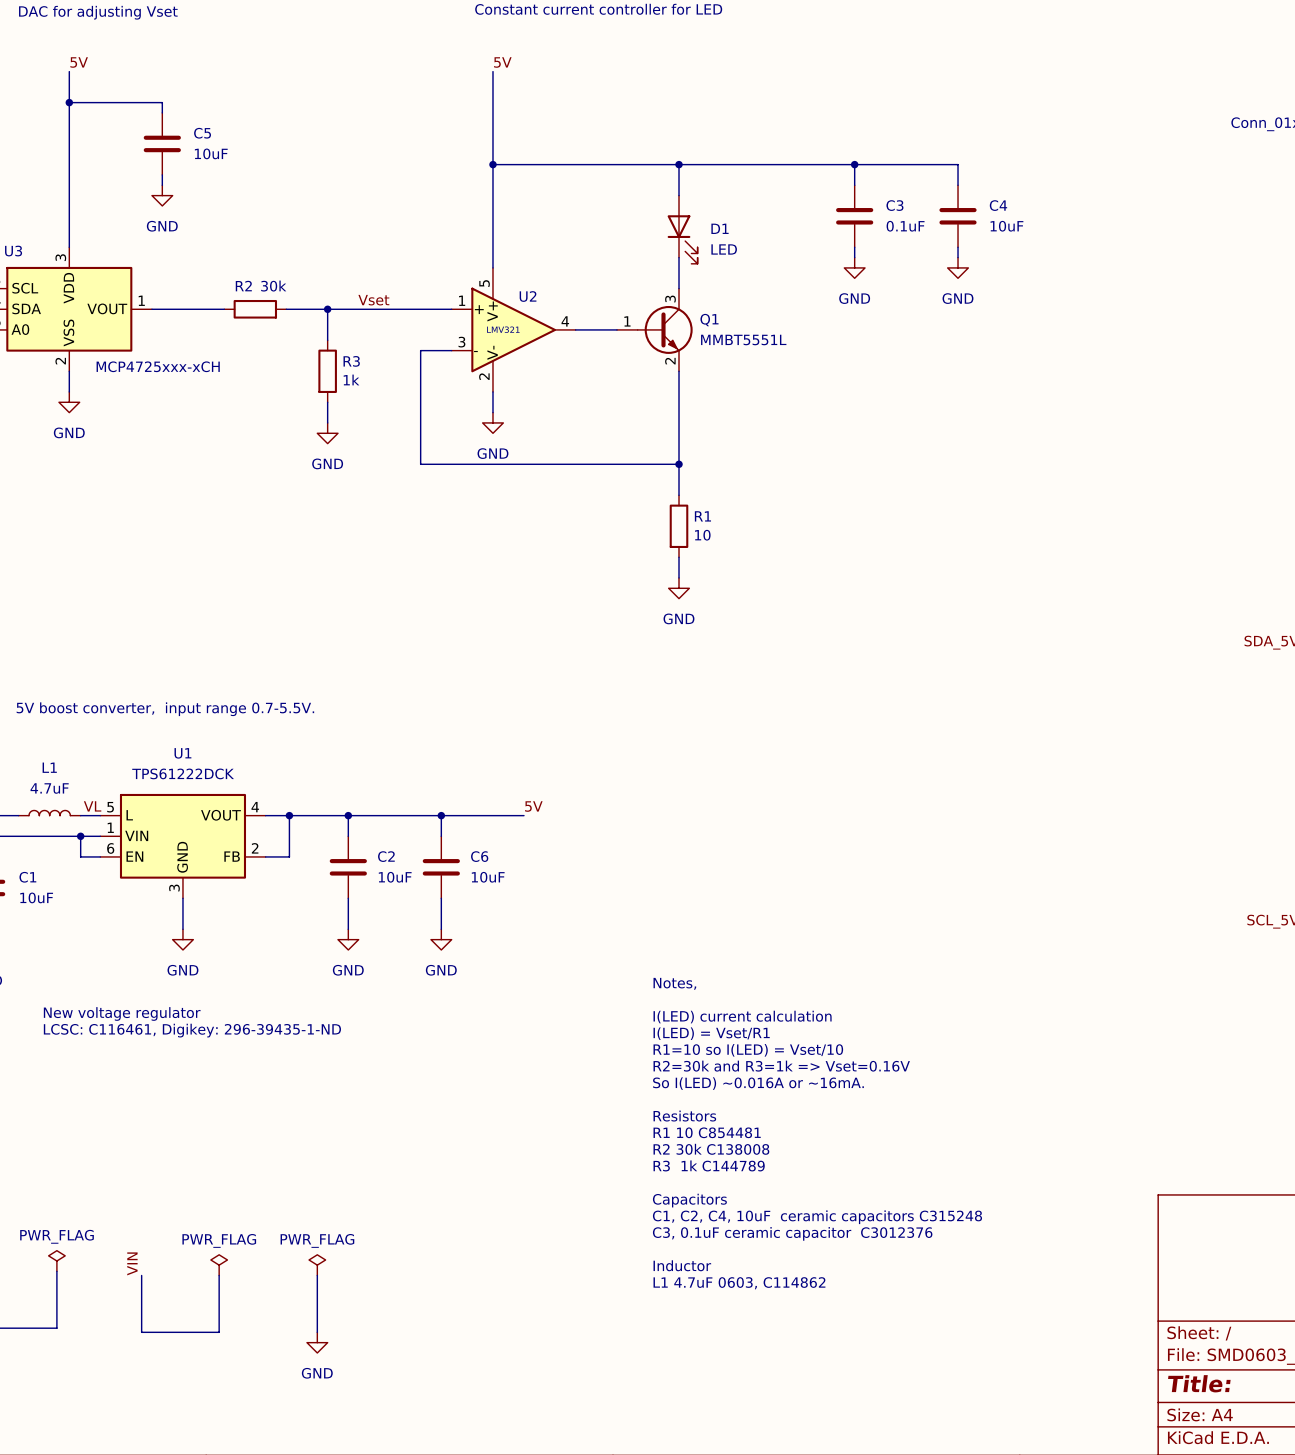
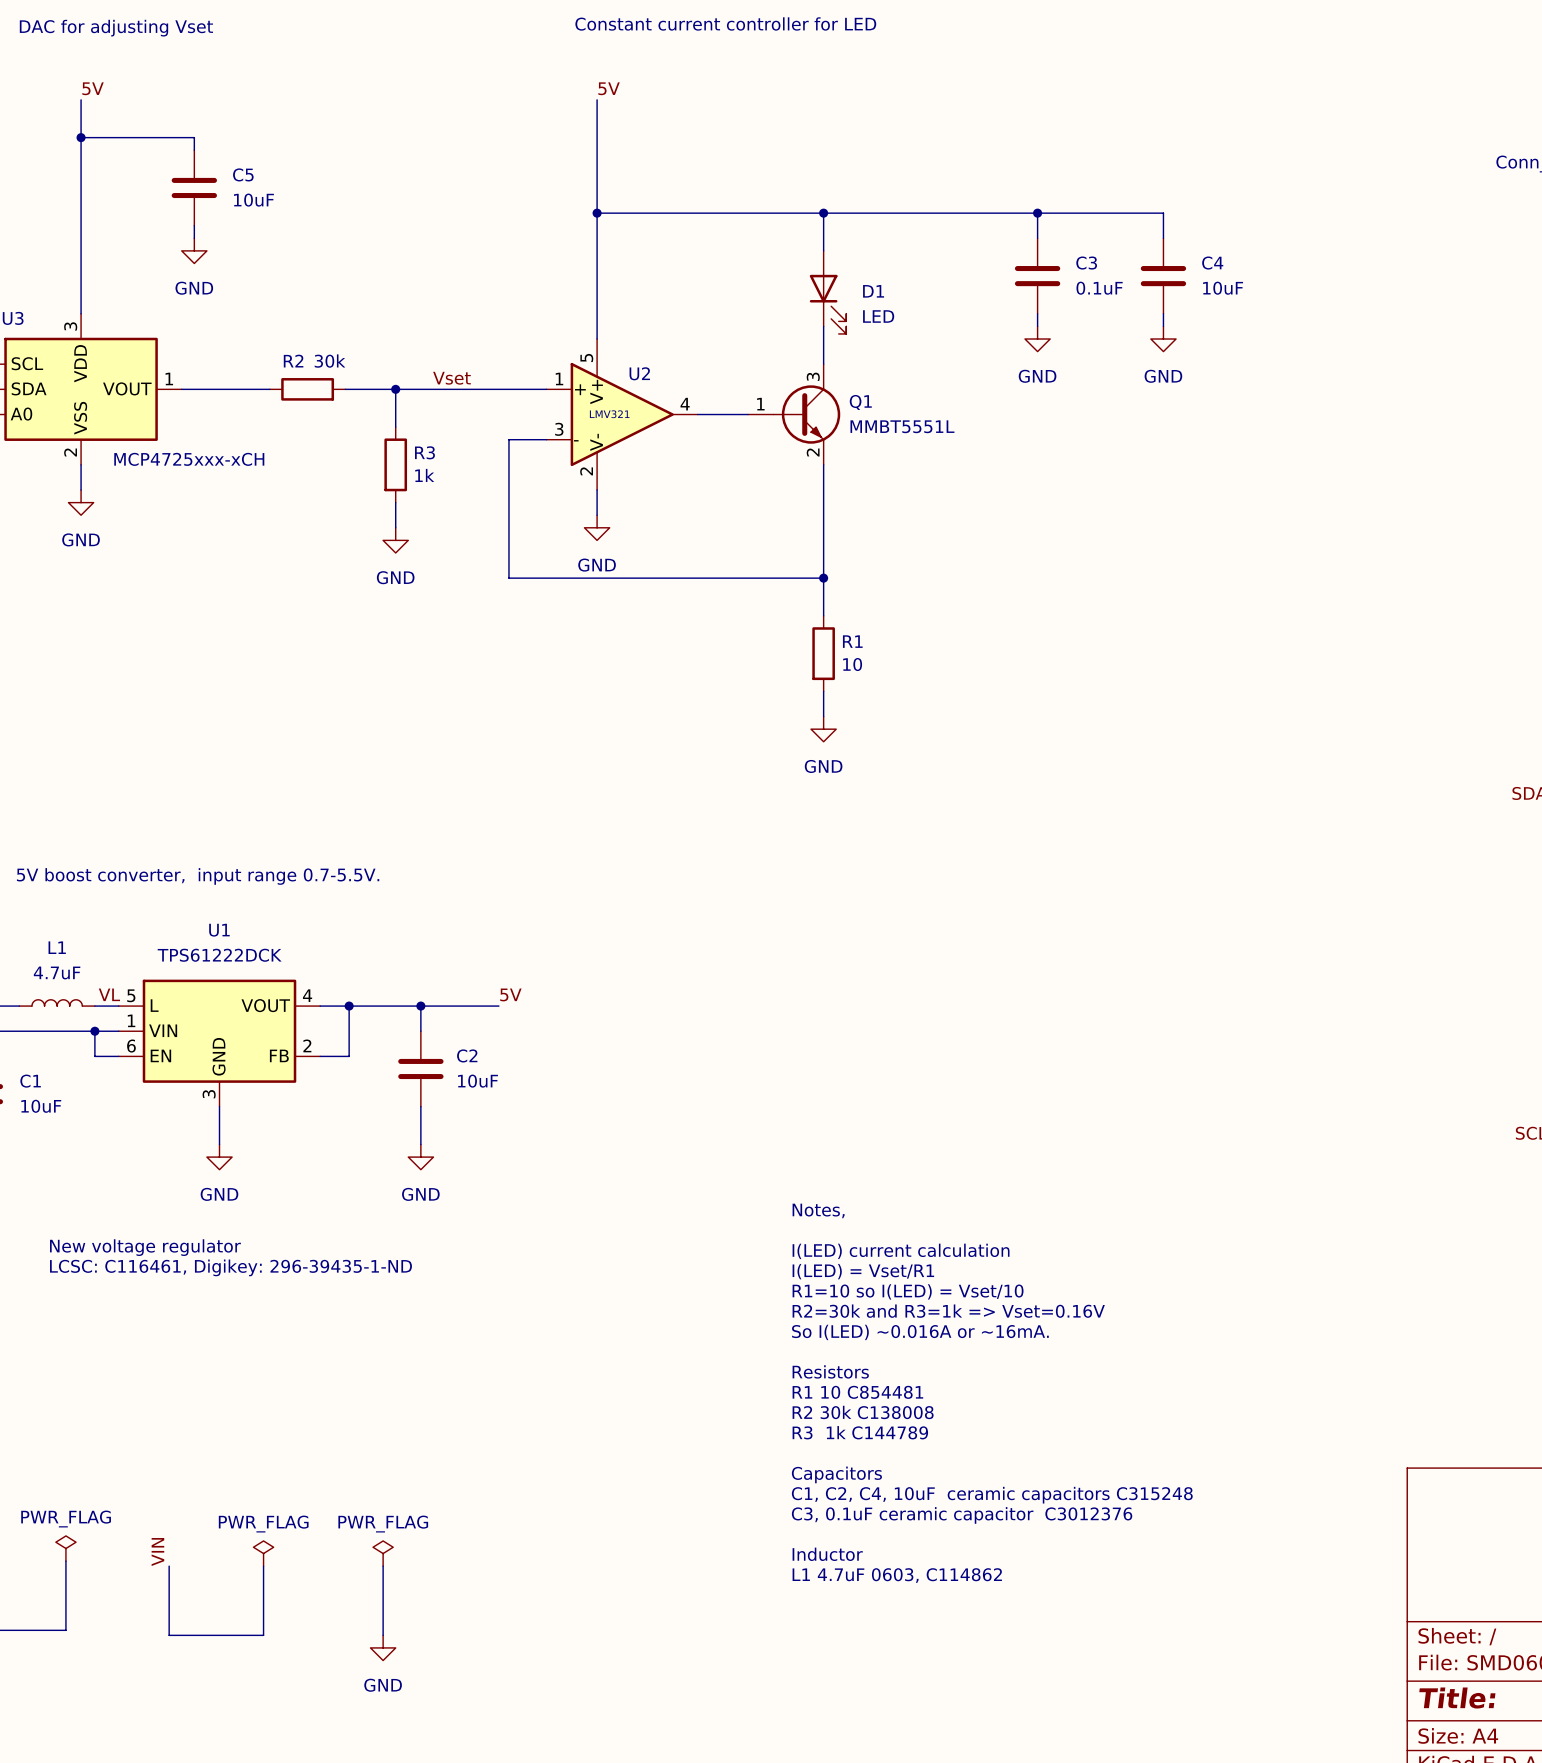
label position: 5V (533, 806) -> 5V (510, 994)
wire: (412, 815) (523, 815) -> none
wire: (441, 815) (441, 836) -> none
junction: (441, 815) -> none
C6: 10uF (441, 867) -> none
wire: (441, 898) (441, 929) -> none
power symbol: GND (441, 939) -> none

